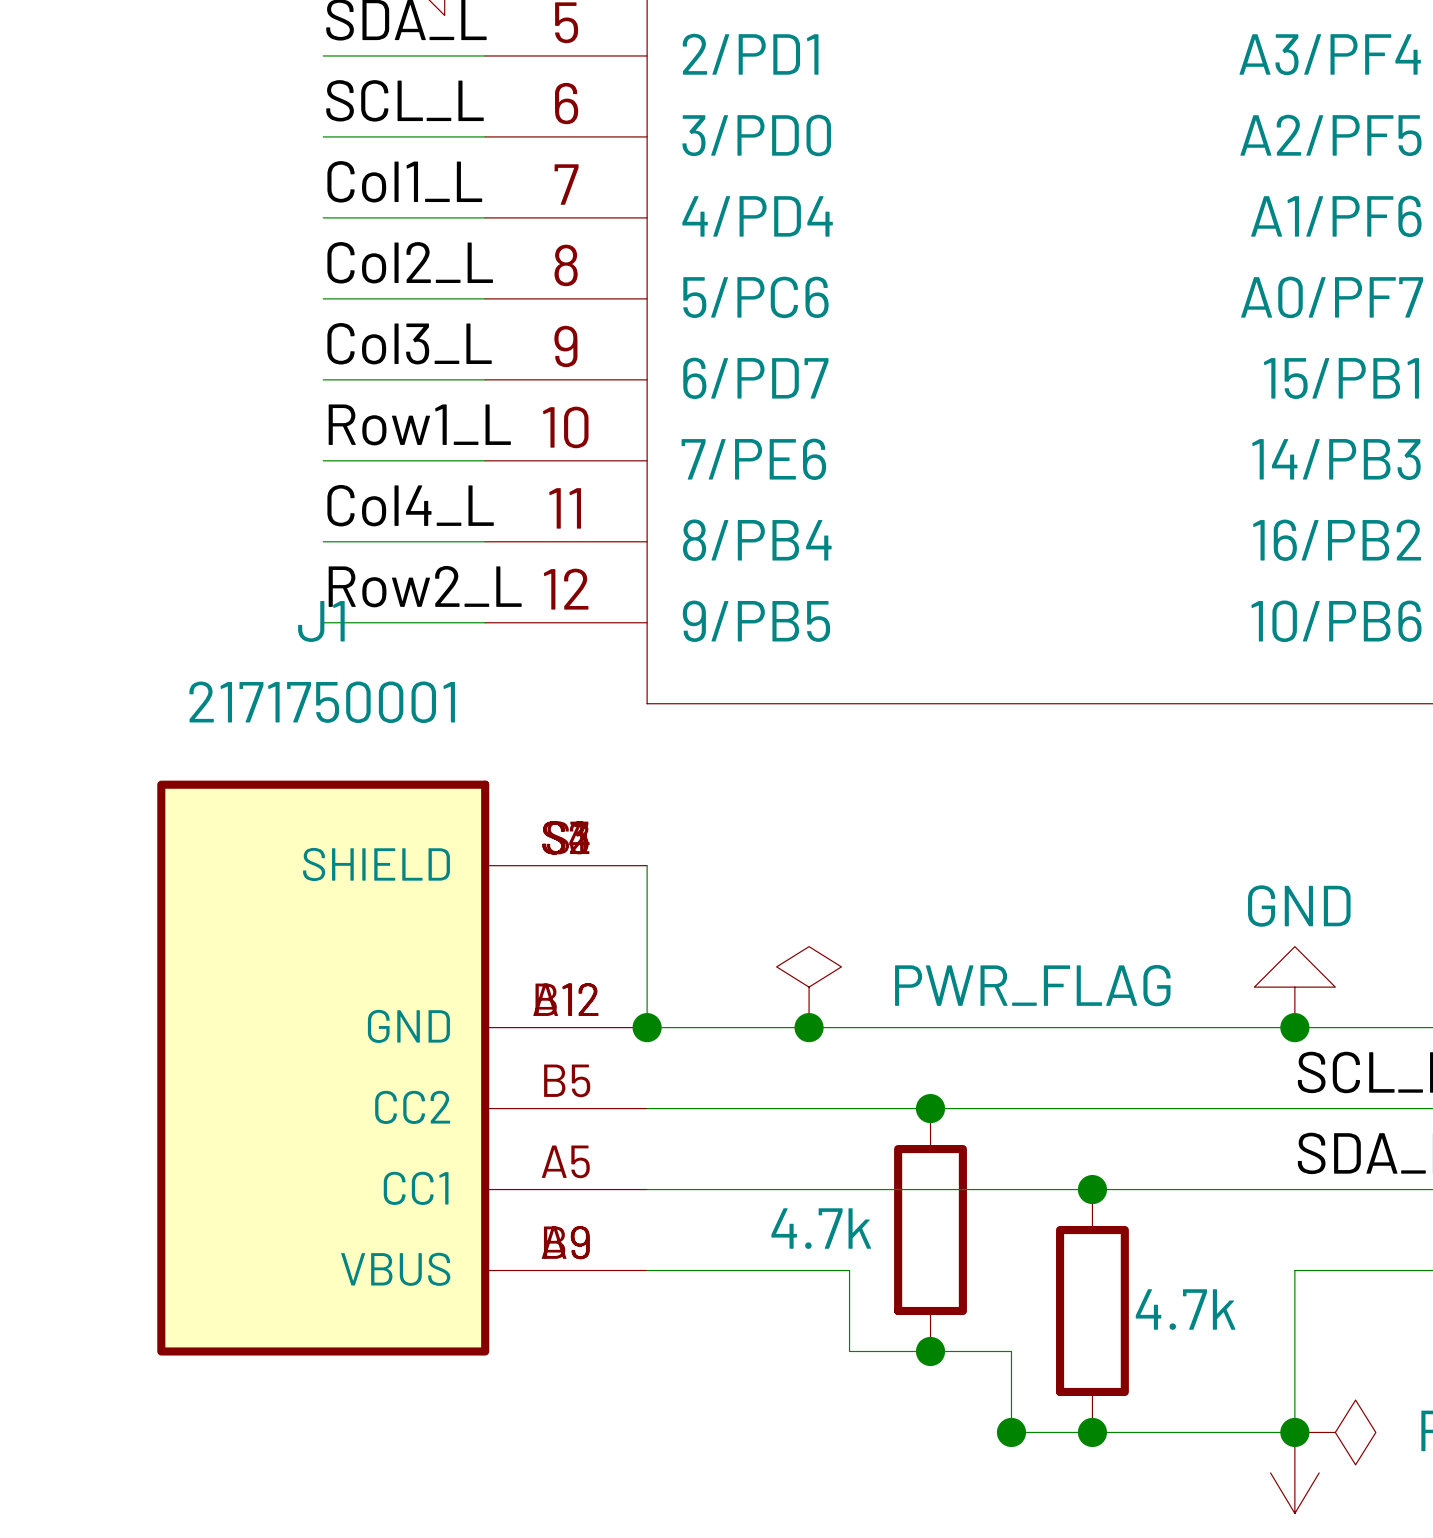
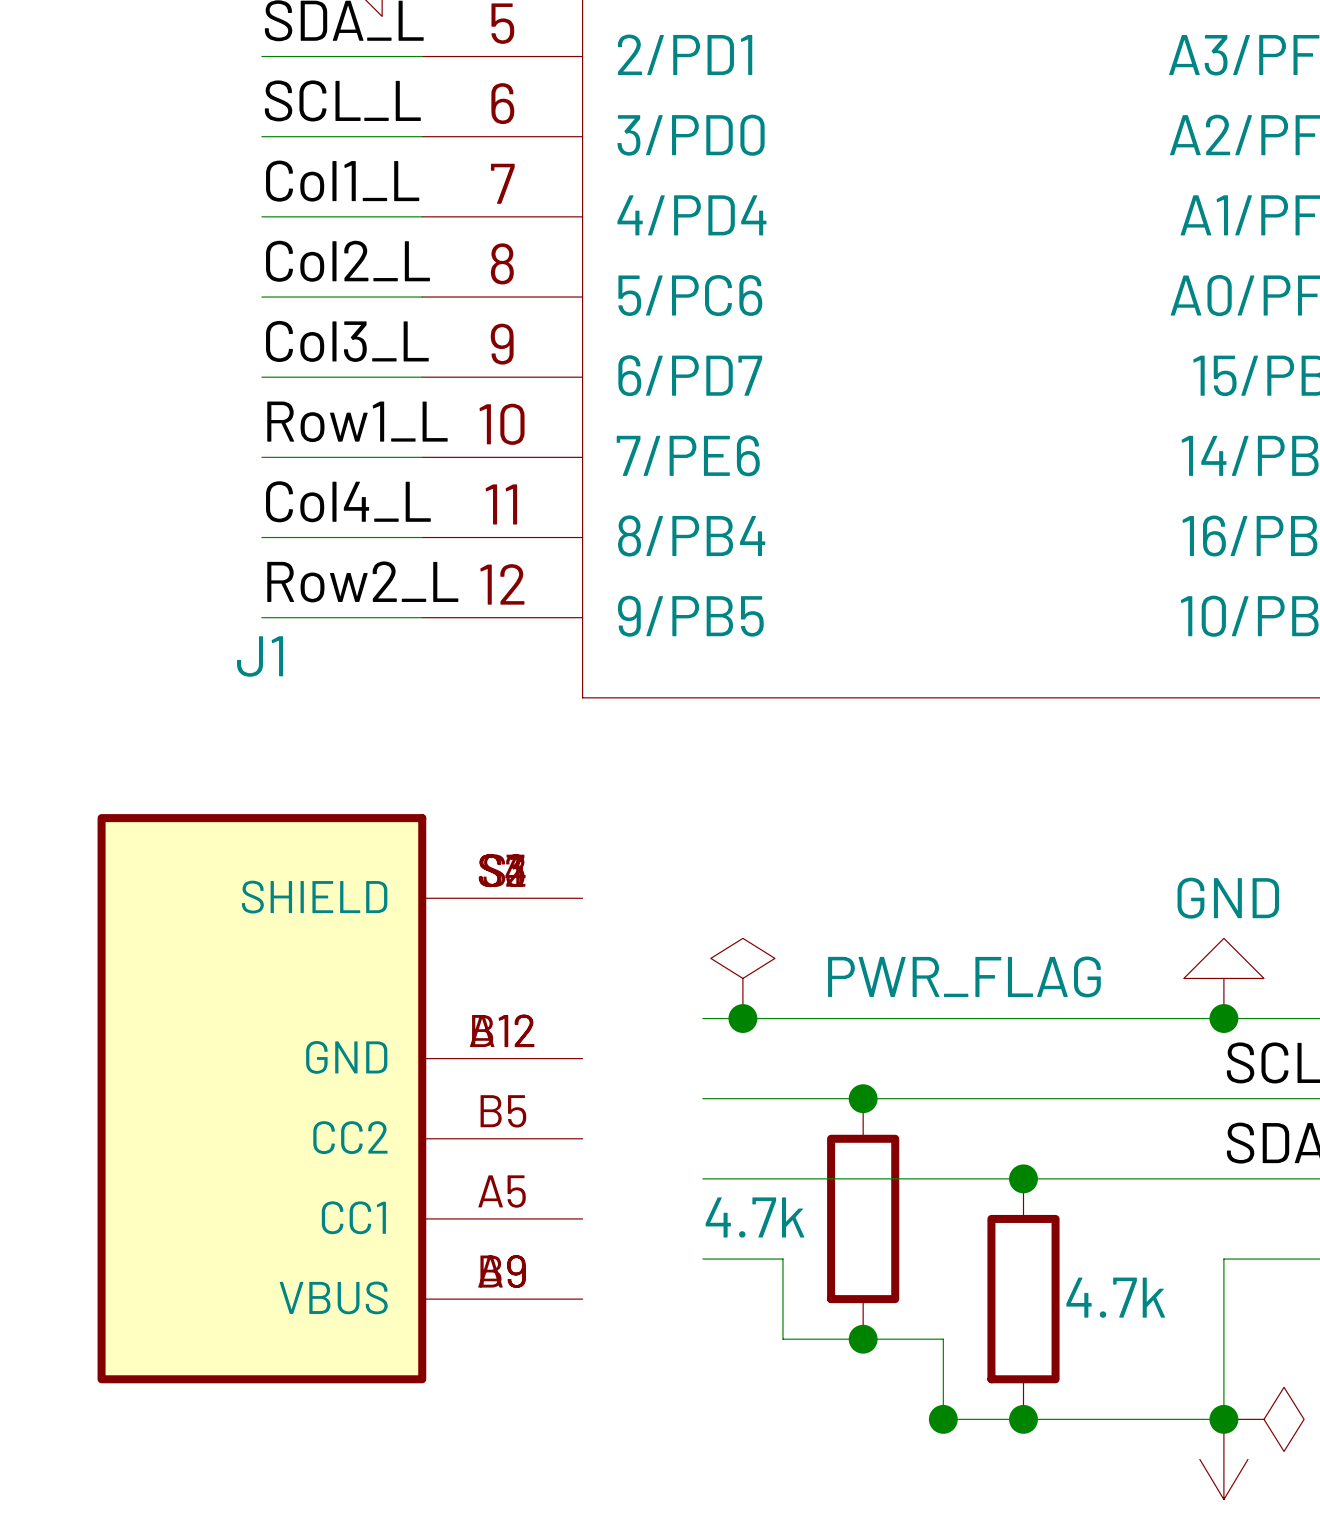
J1 value: 2171750001 (322, 702) -> none
wire: (647, 865) (647, 1027) (768, 1027) -> none
junction: (647, 1027) -> none
J1 position: (402, 1068) -> (340, 1098)
wire: (647, 1108) (768, 1108) -> none
wire: (647, 1189) (768, 1189) -> none
wire: (647, 1270) (768, 1270) -> none

